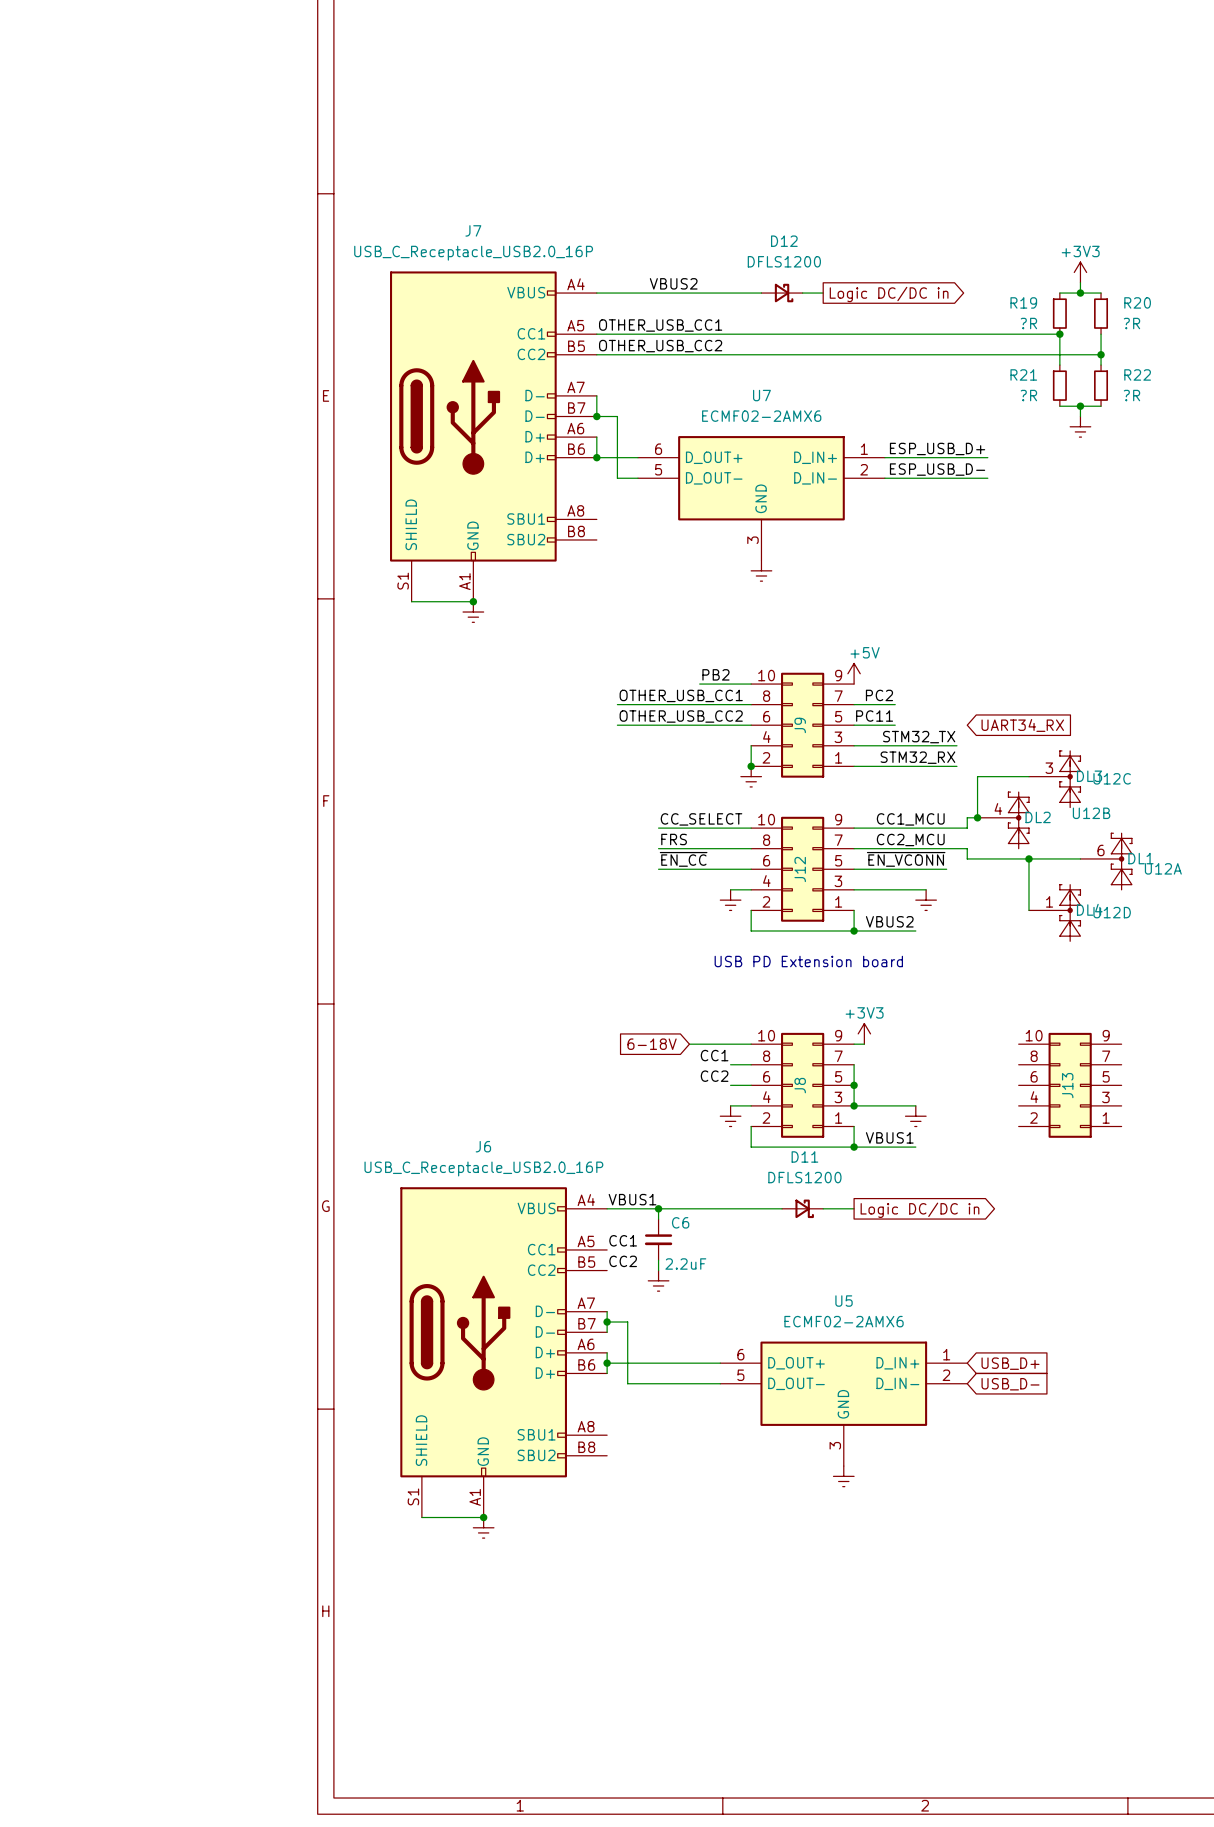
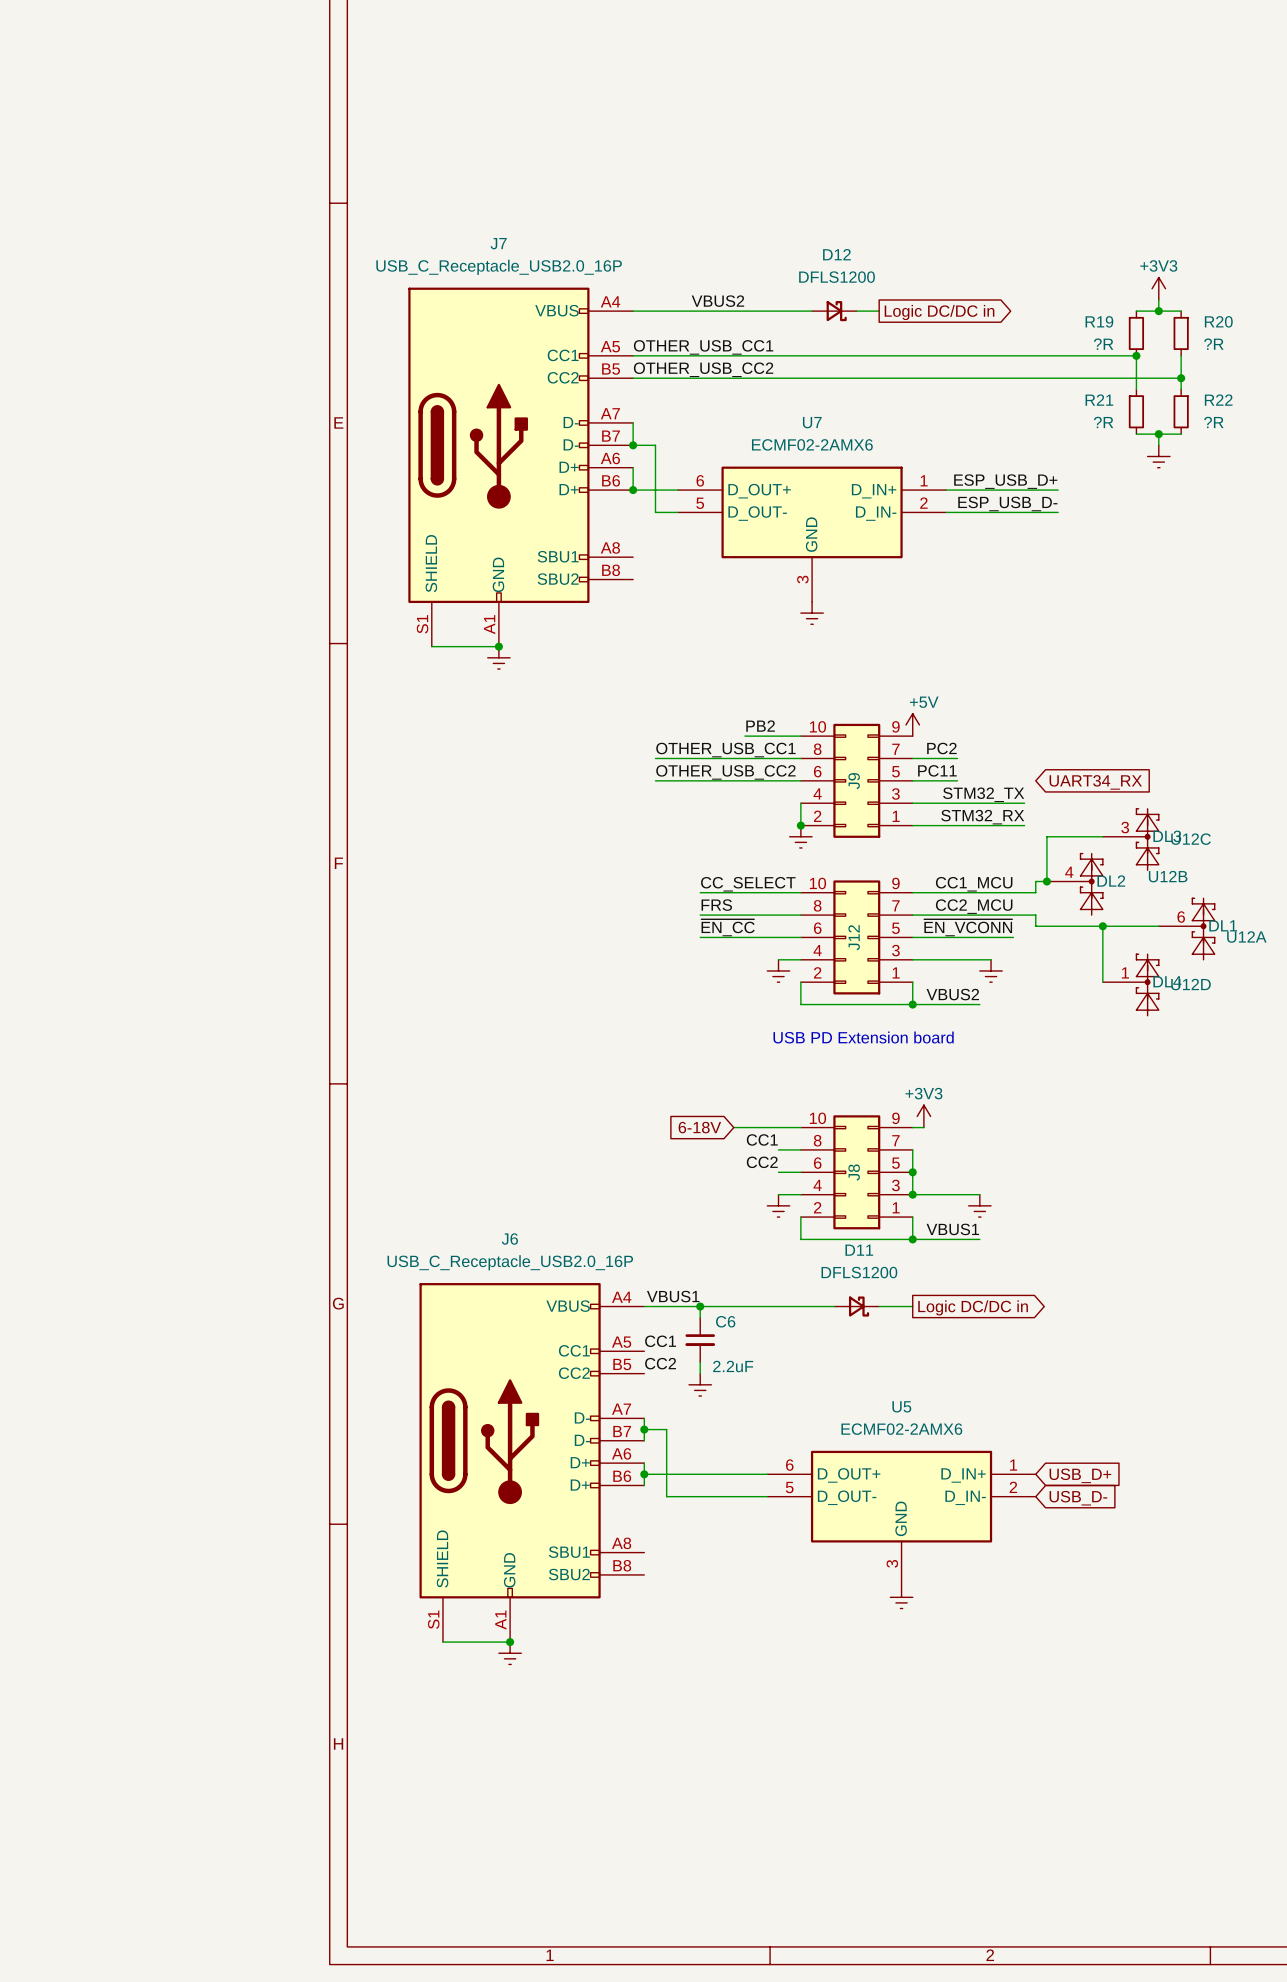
J13: (1070, 1085) -> none

